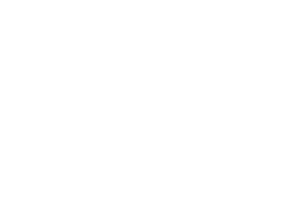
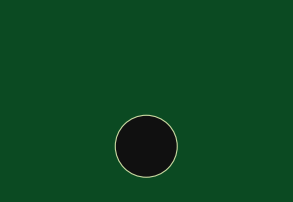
part: none -> (146, 146)

